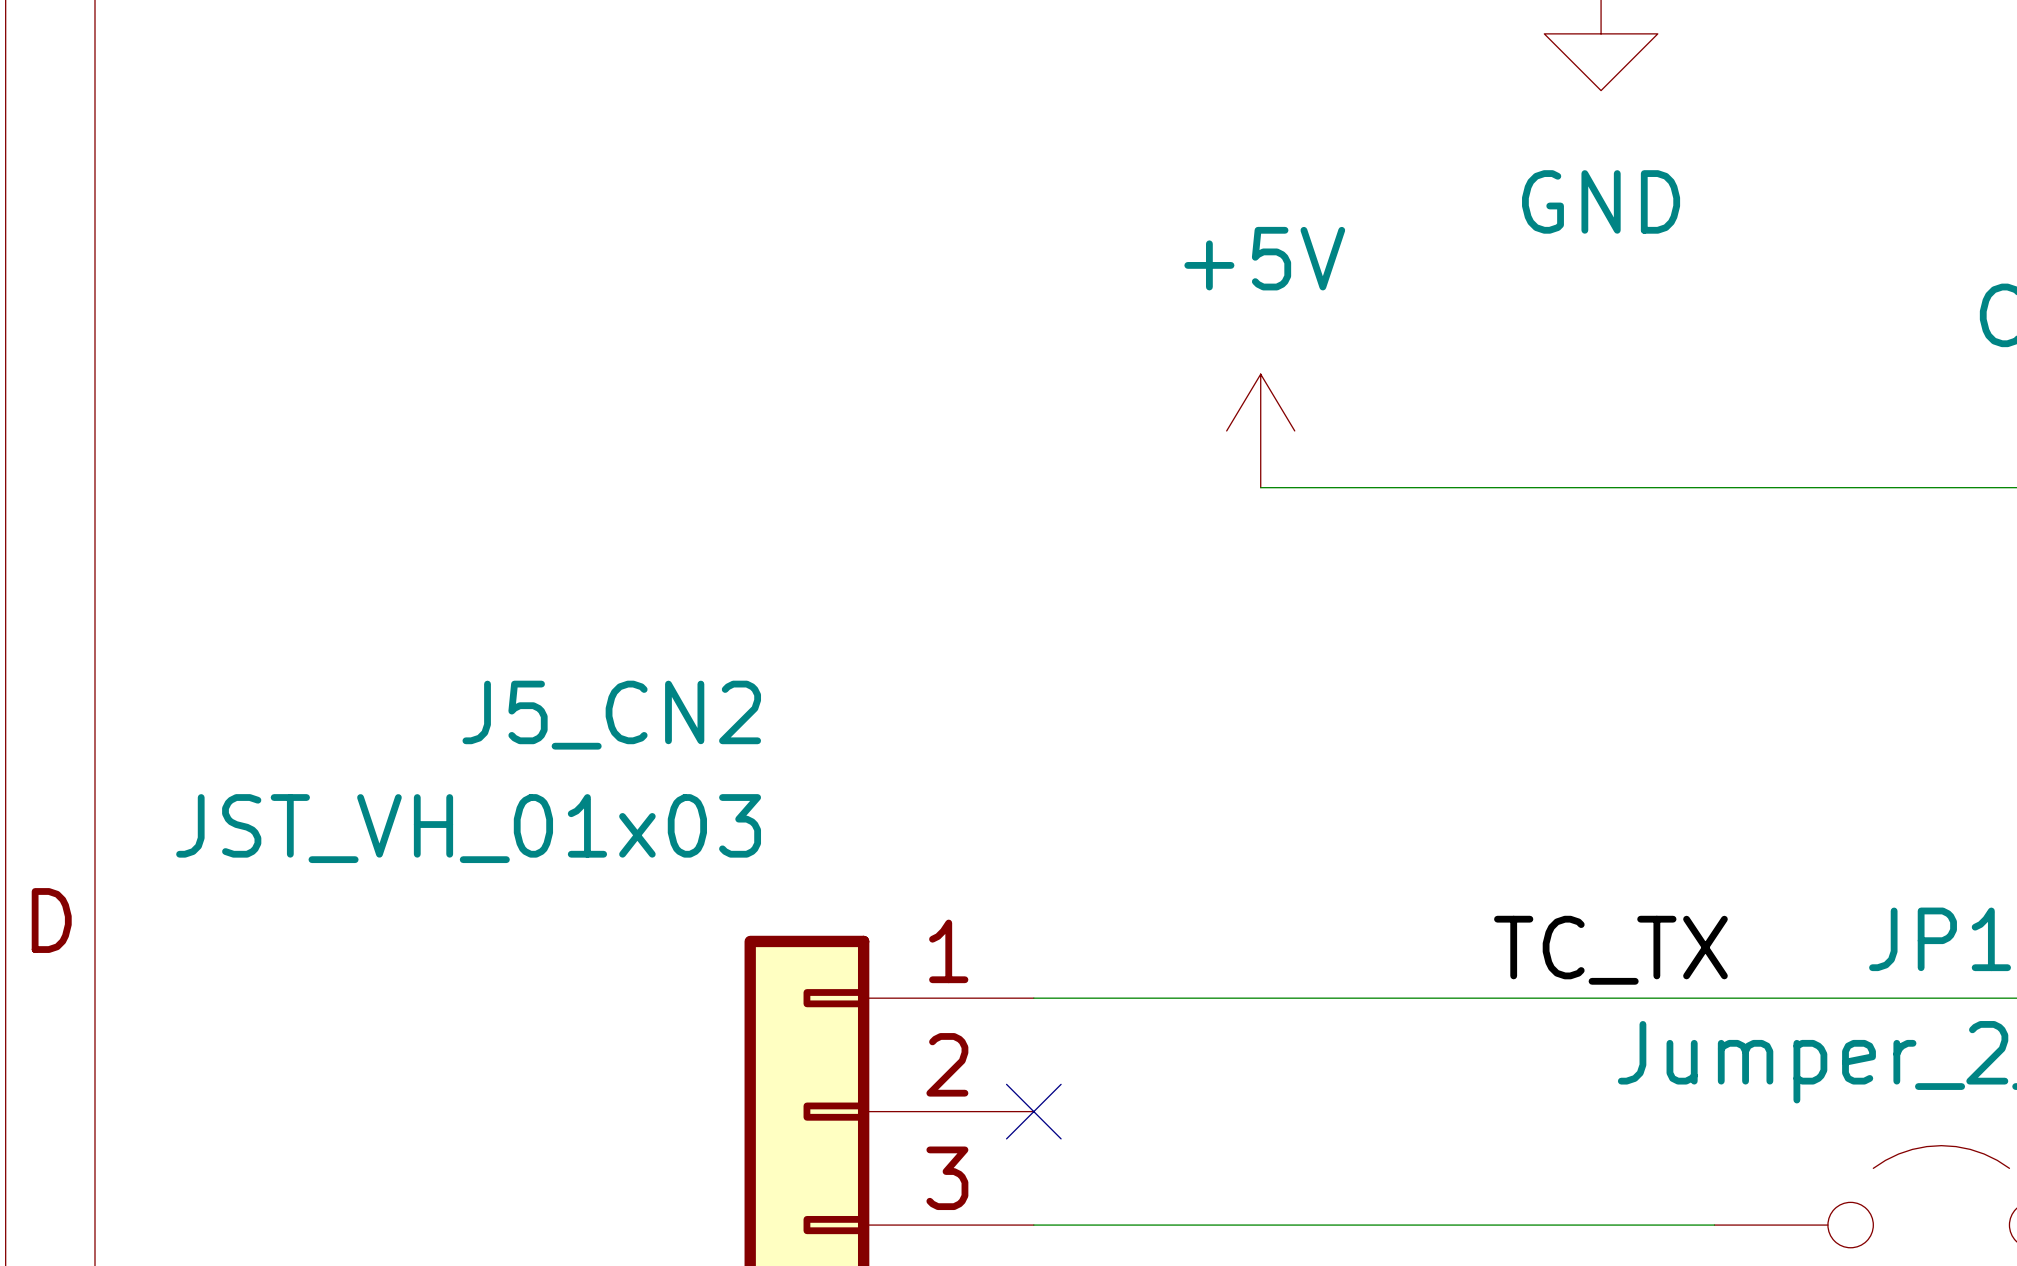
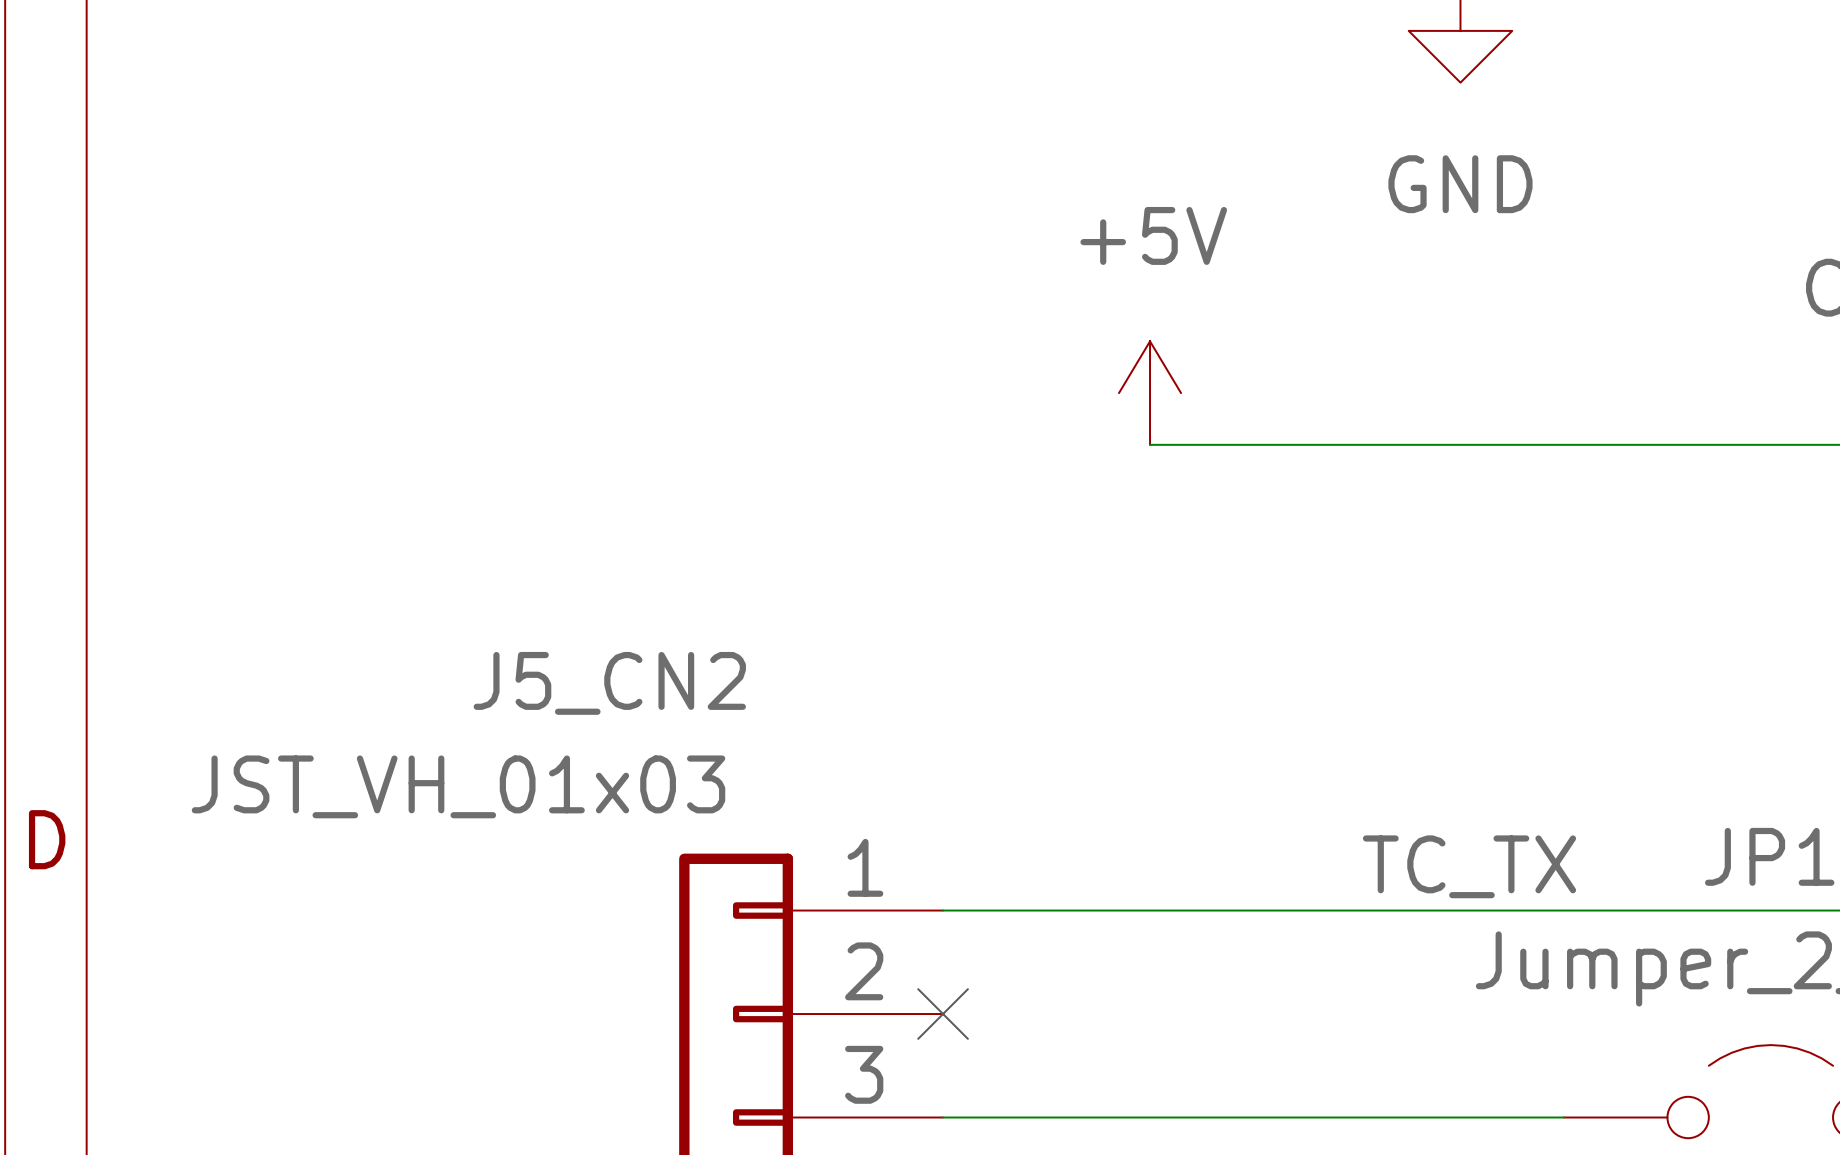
J5_CN2 name position: J5_CN2 (611, 715) -> J5_CN2 (609, 683)
J5_CN2 value position: JST_VH_01x03 (468, 828) -> JST_VH_01x03 (458, 786)

